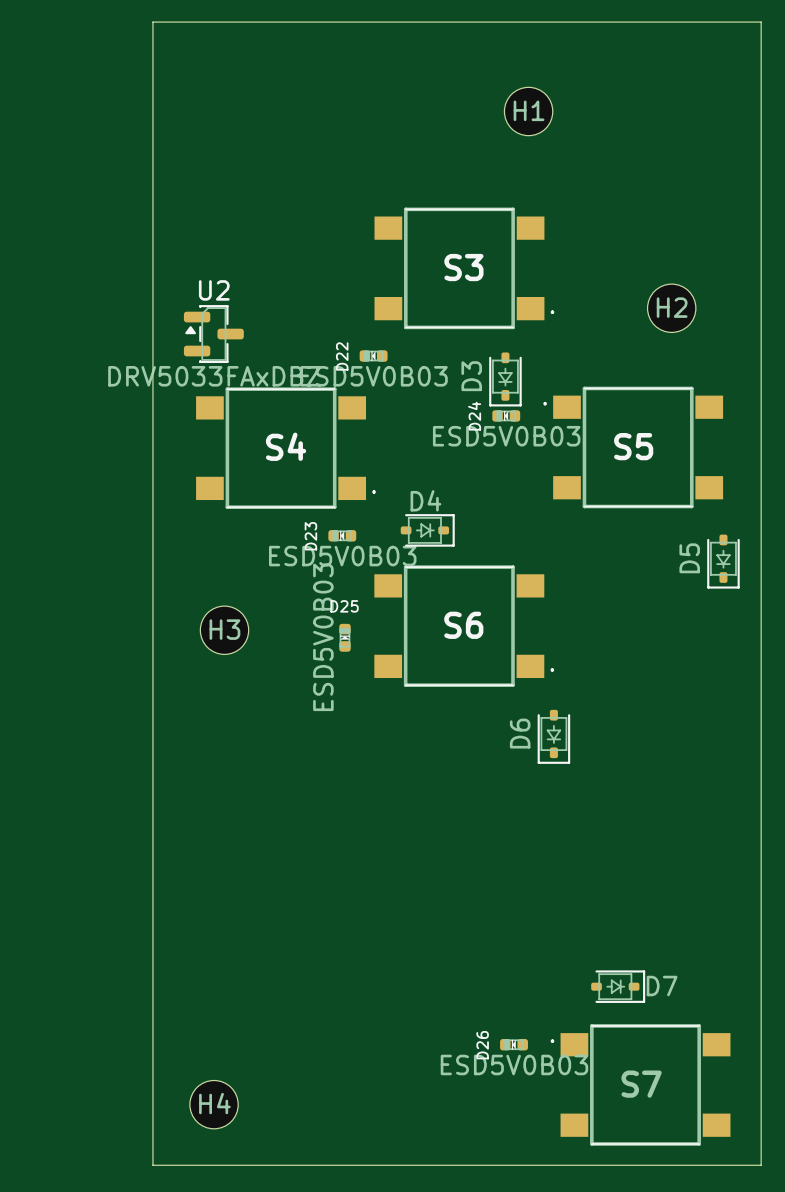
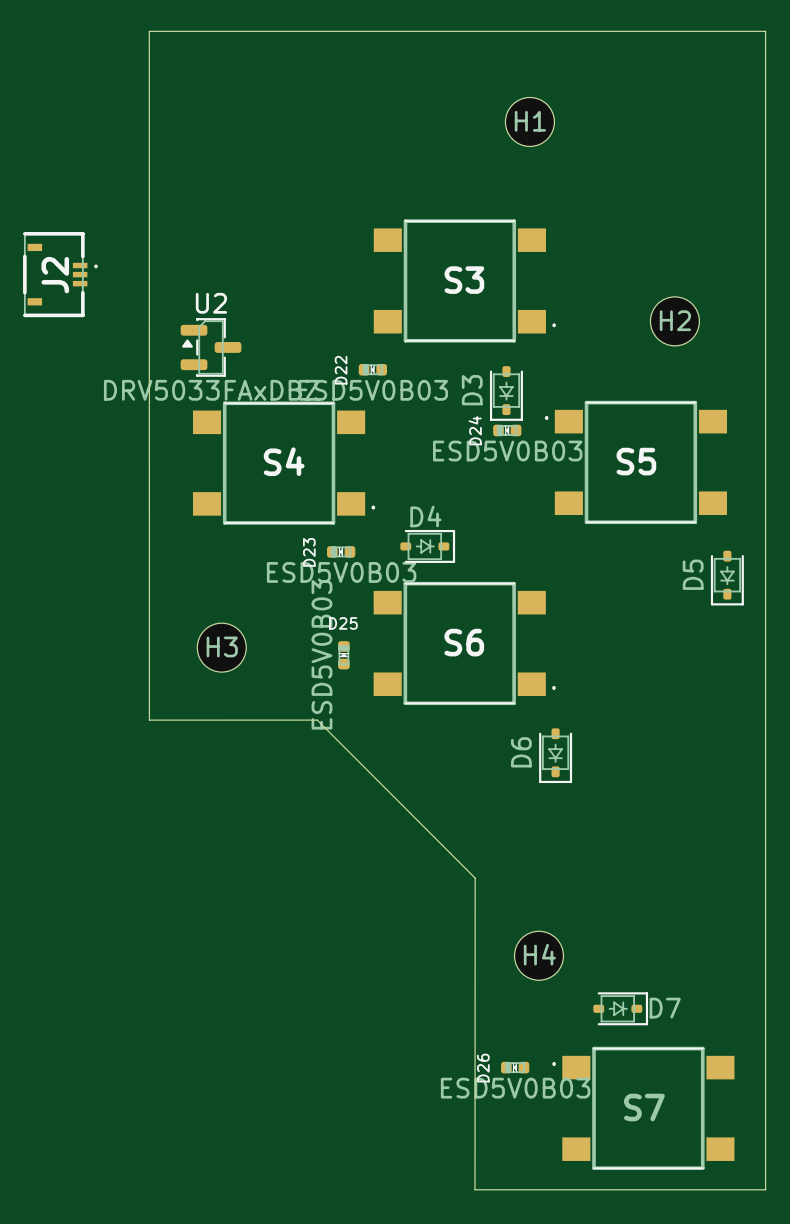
board edge: (152, 22) (152, 1165) (474, 1165) -> (149, 31) (149, 720) (317, 720) (475, 878) (475, 1189)
J2: none -> (60, 274)
H4 position: (214, 1104) -> (539, 955)

